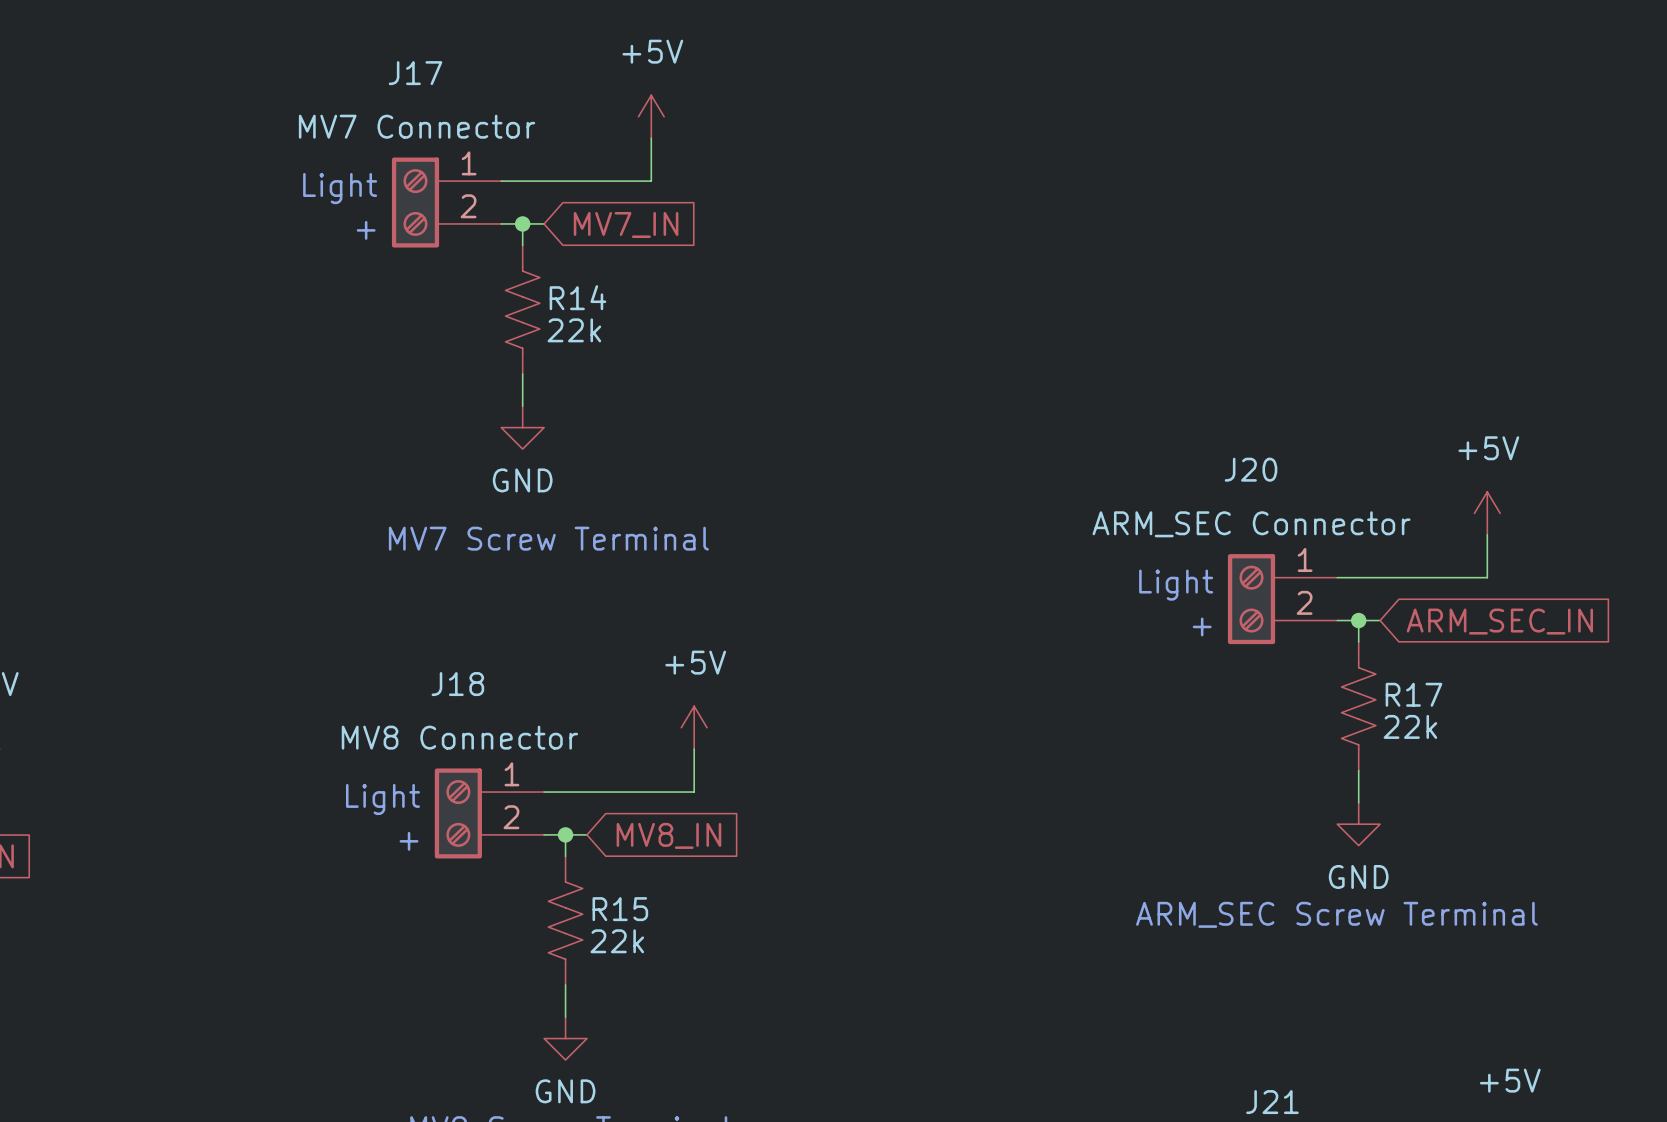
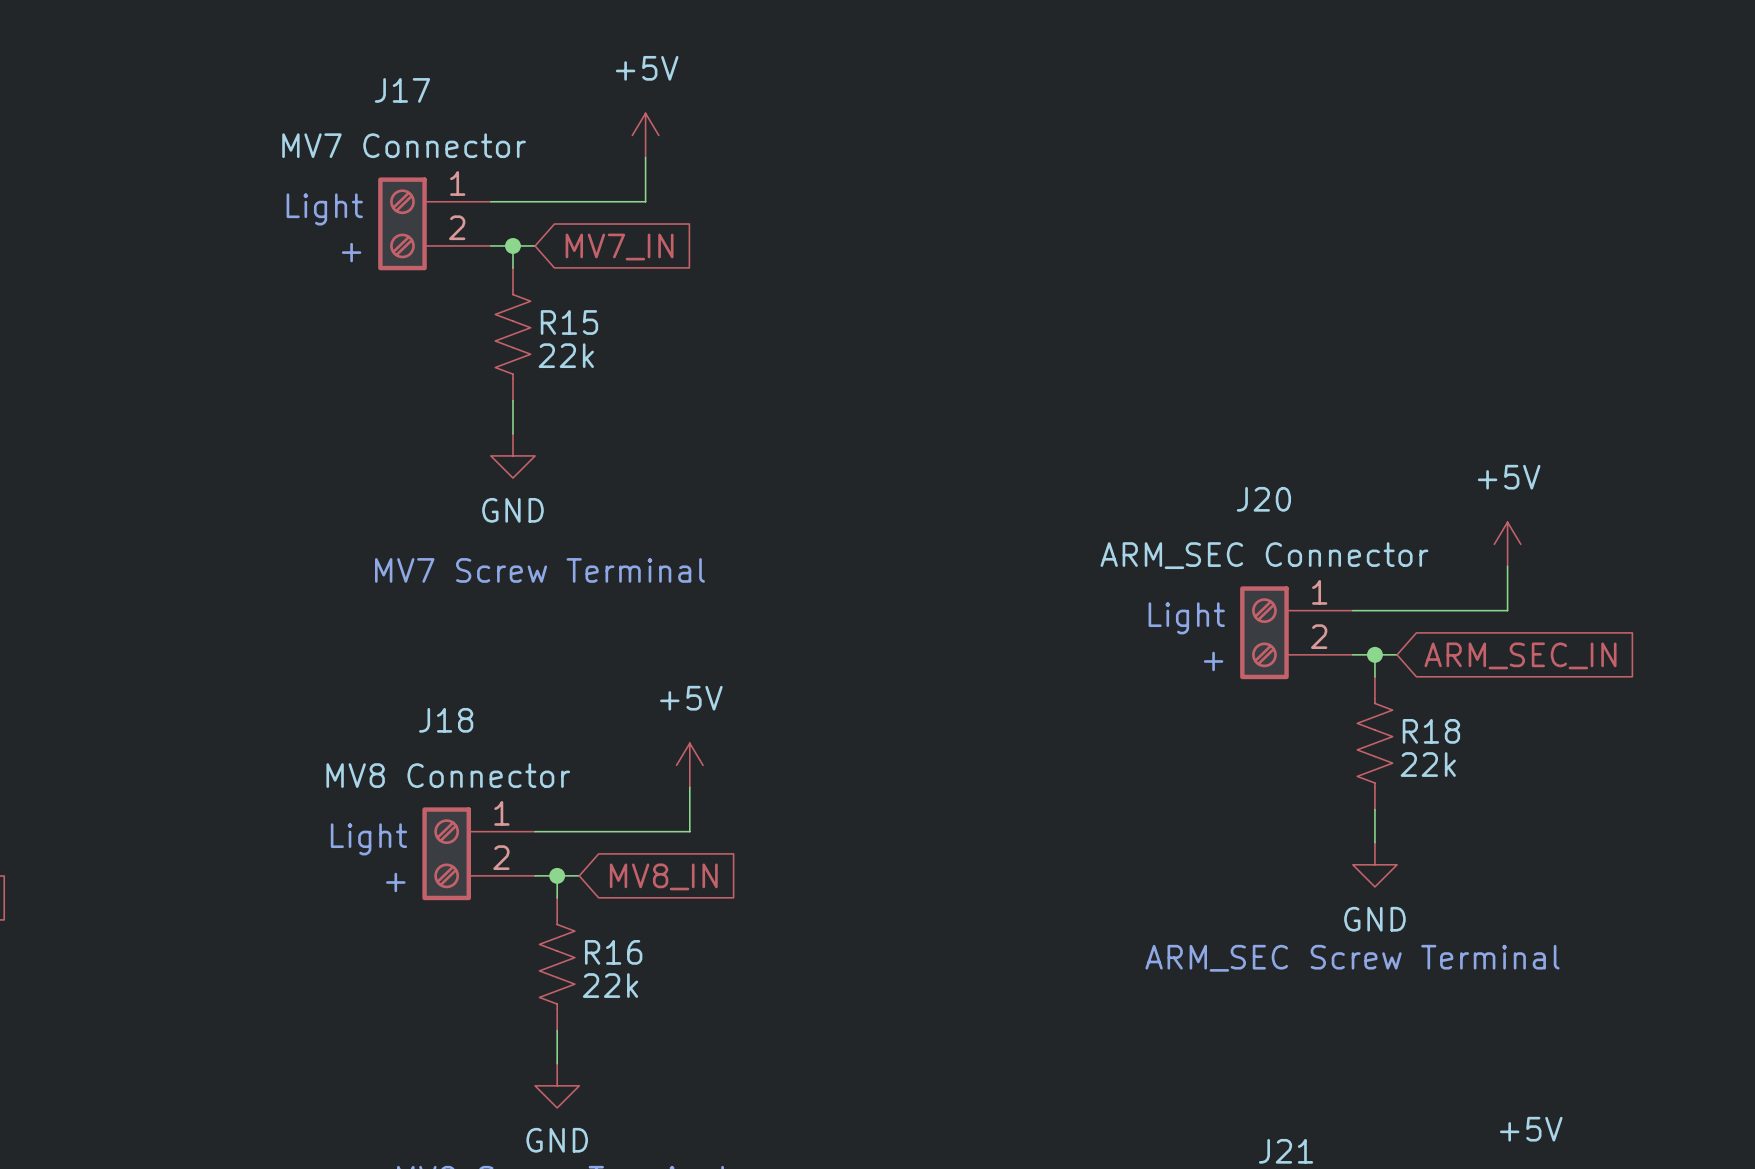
R14 name: R14 (577, 297) -> R15 (569, 322)
R17 name: R17 (1413, 694) -> R18 (1431, 731)
R15 name: R15 (620, 909) -> R16 (613, 952)

